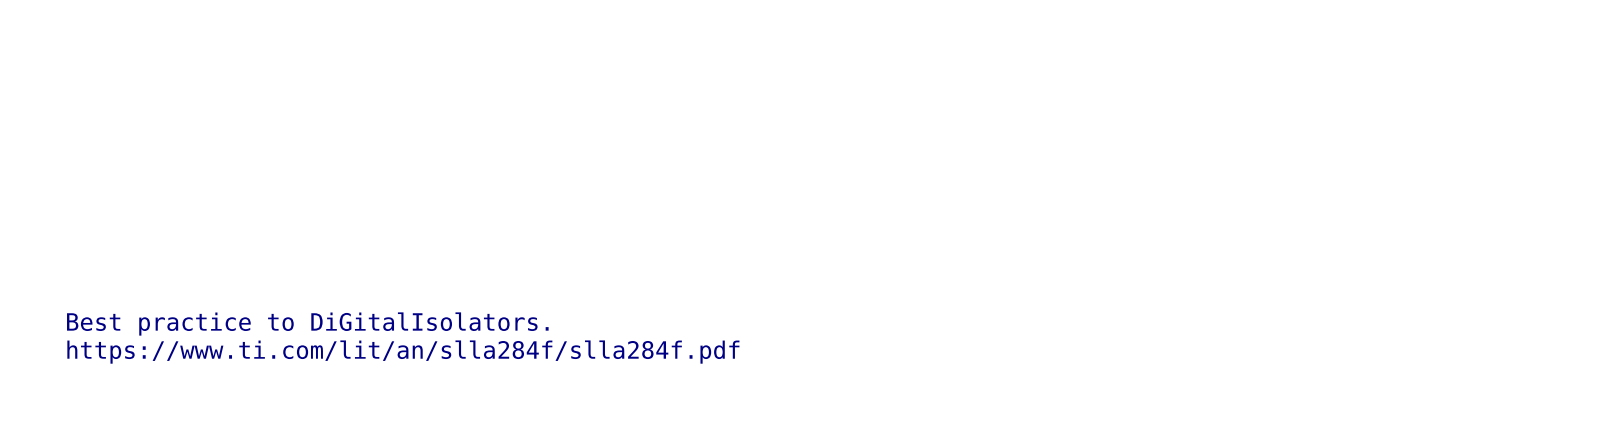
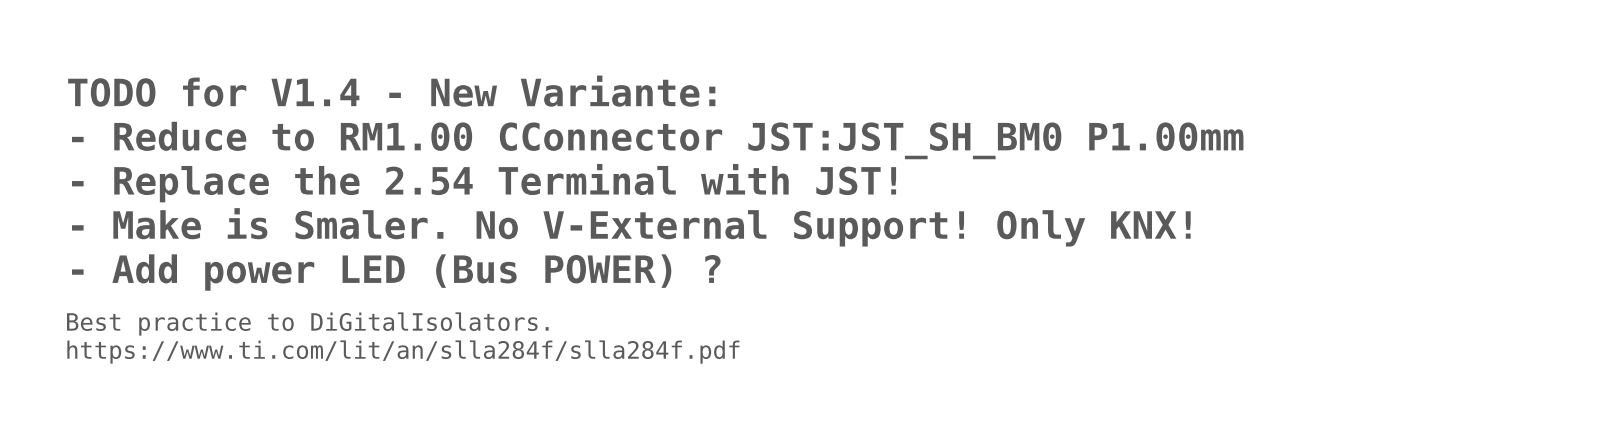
text: none -> TODO for V1.4 - New Variante: (391, 91)
text: none -> - Reduce to RM1.00 CConnector JST:JST_SH_BM0 P1.00mm (657, 140)
text: none -> - Replace the 2.54 Terminal with JST! (484, 183)
text: none -> - Make is Smaler. No V-External Support! Only KNX! (631, 227)
text: none -> - Add power LED (Bus POWER) ? (396, 272)

